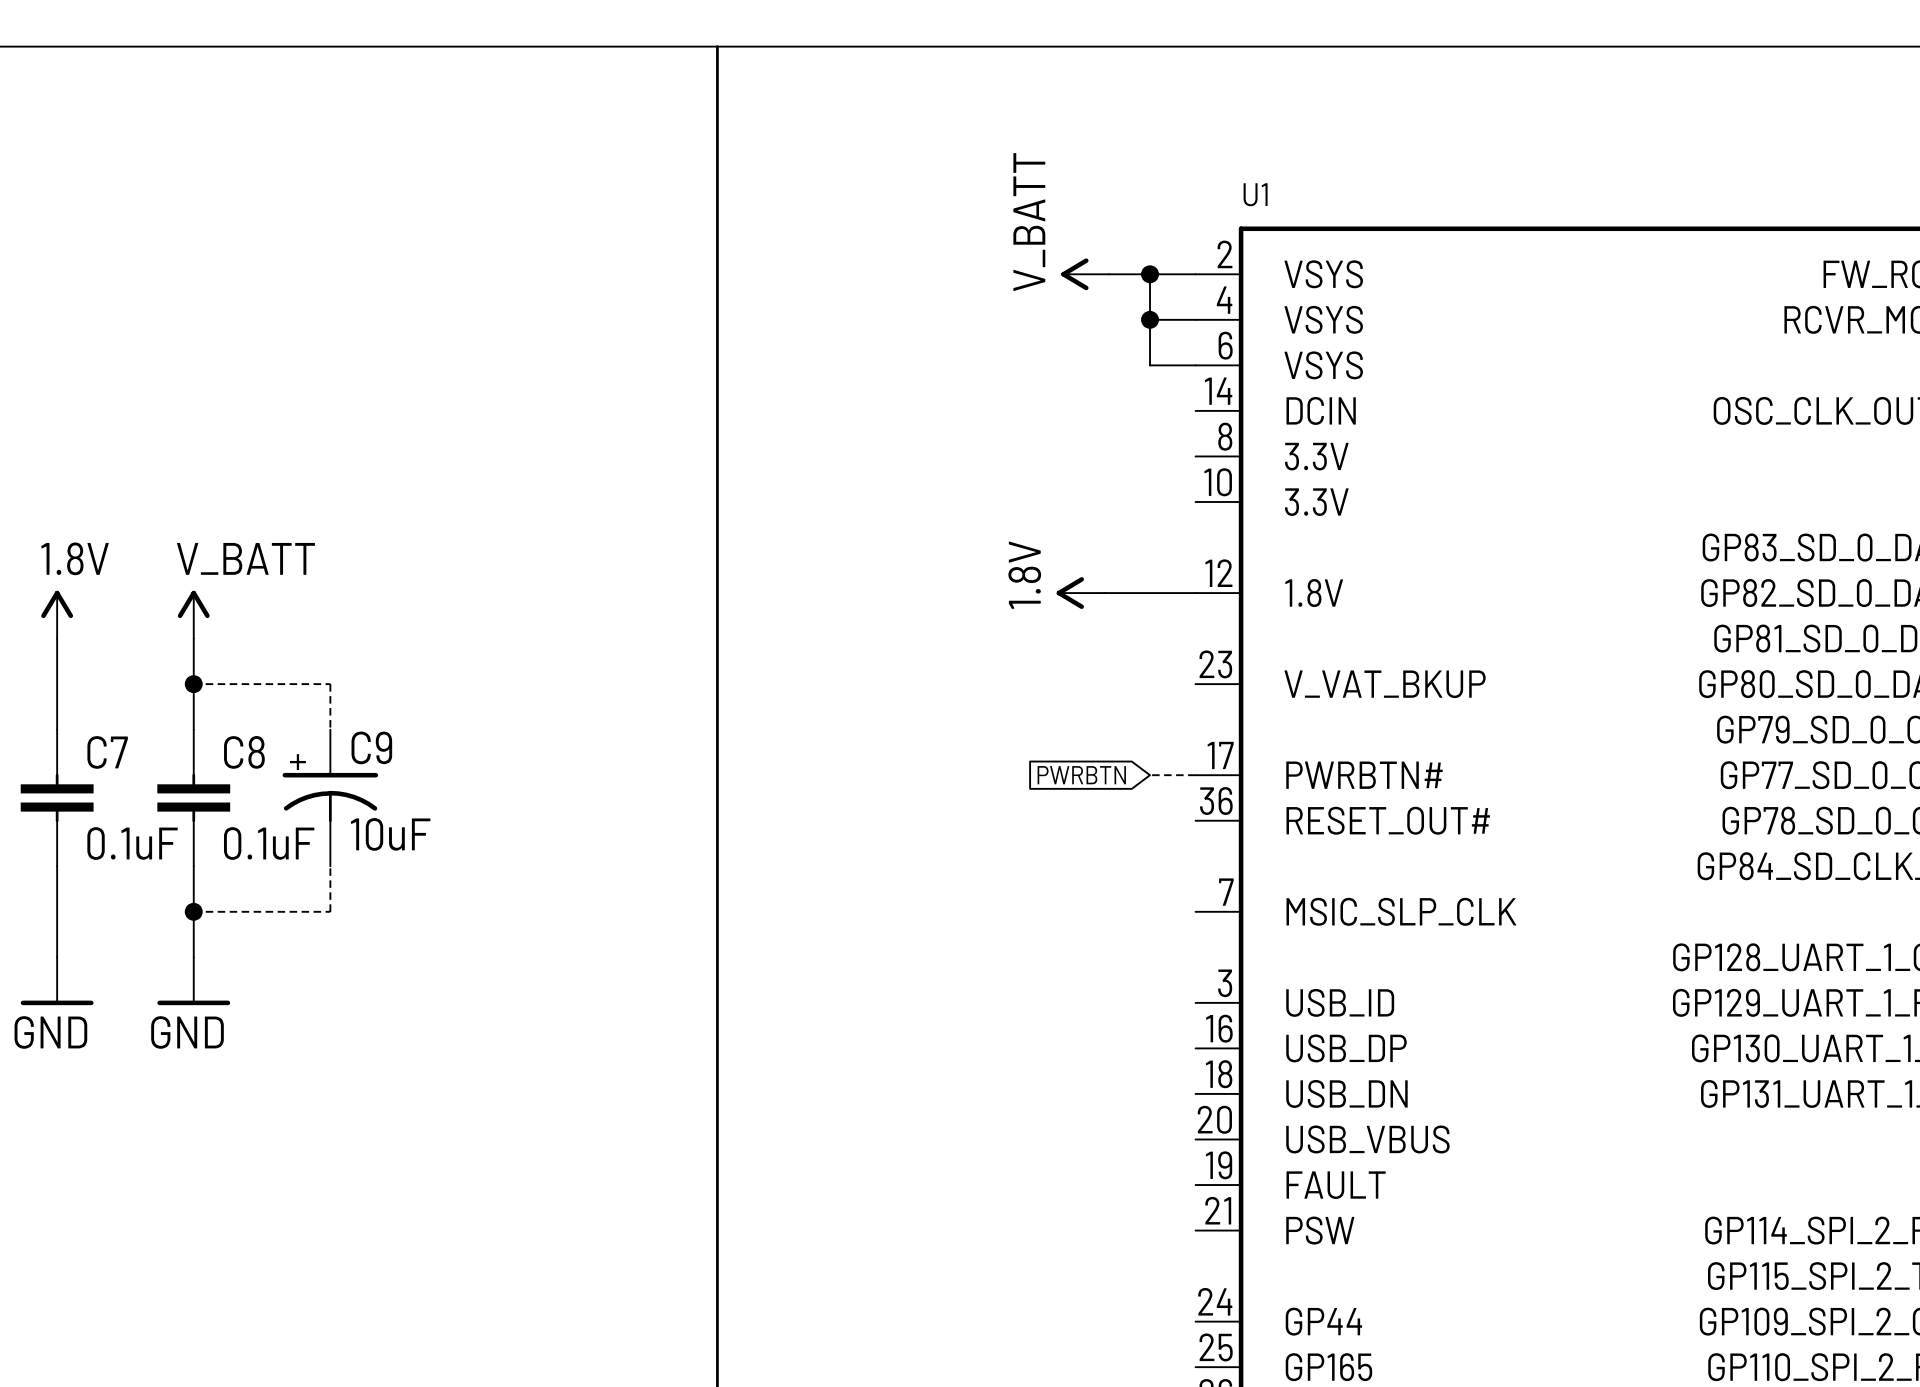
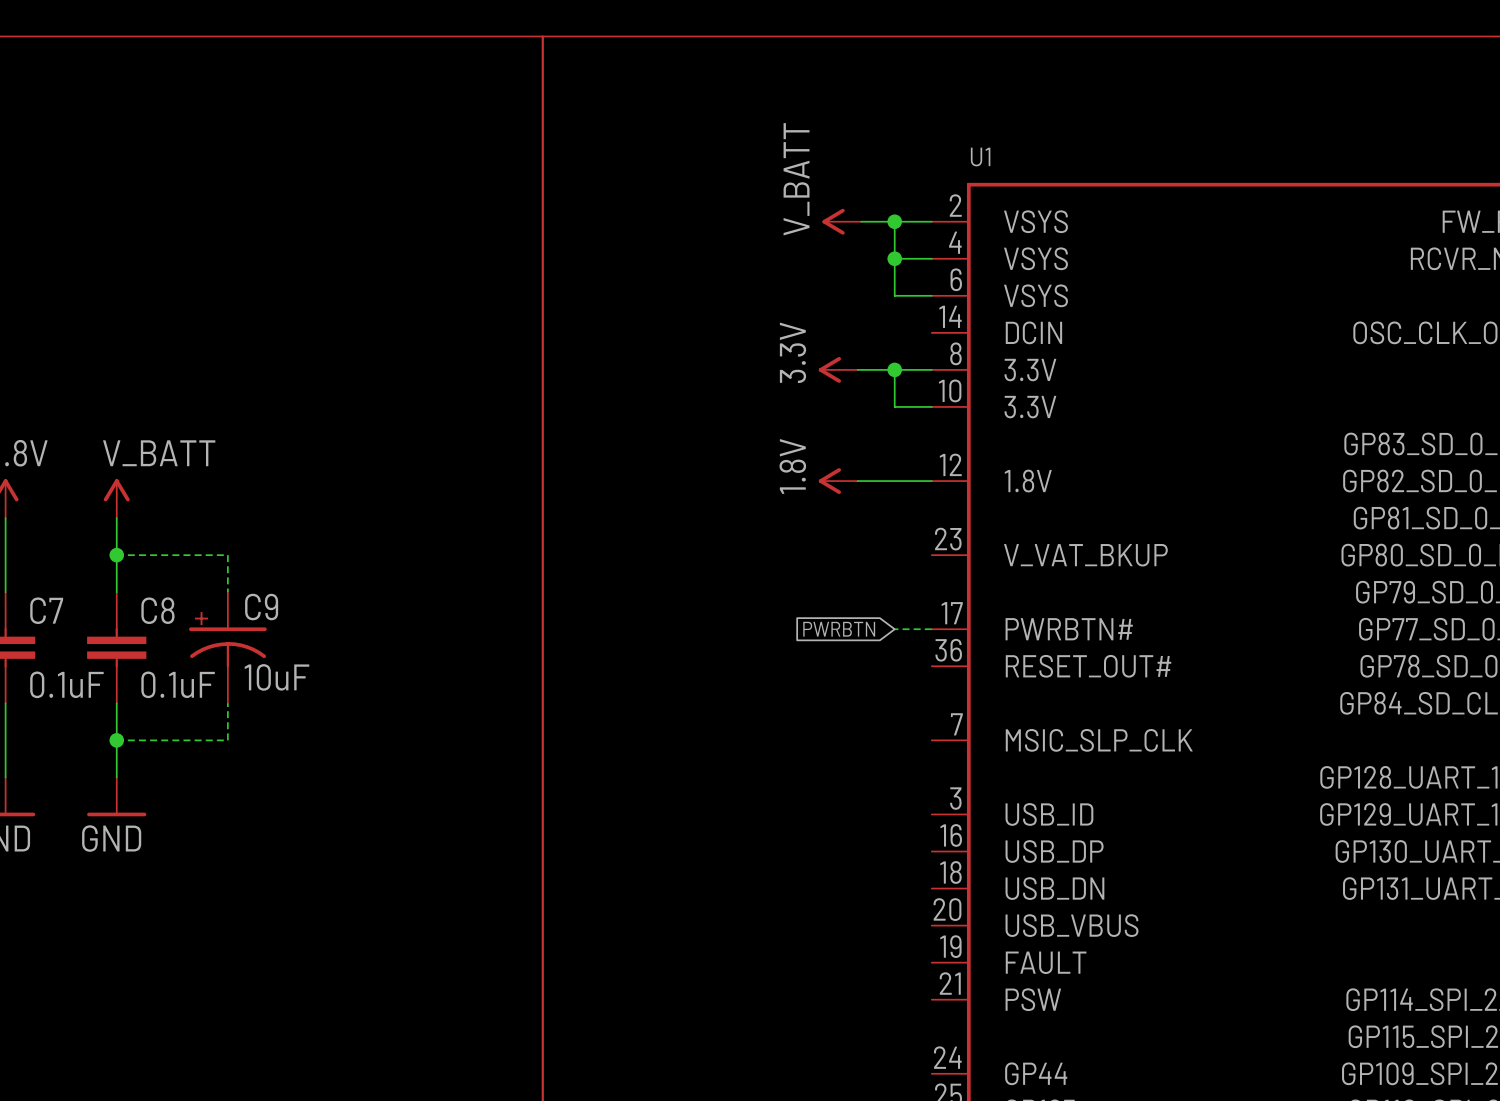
power symbol: none -> 3.3V (838, 369)
wire: none -> (857, 369) (931, 369)
wire: none -> (894, 369) (894, 406) (931, 406)
junction: none -> (894, 369)

